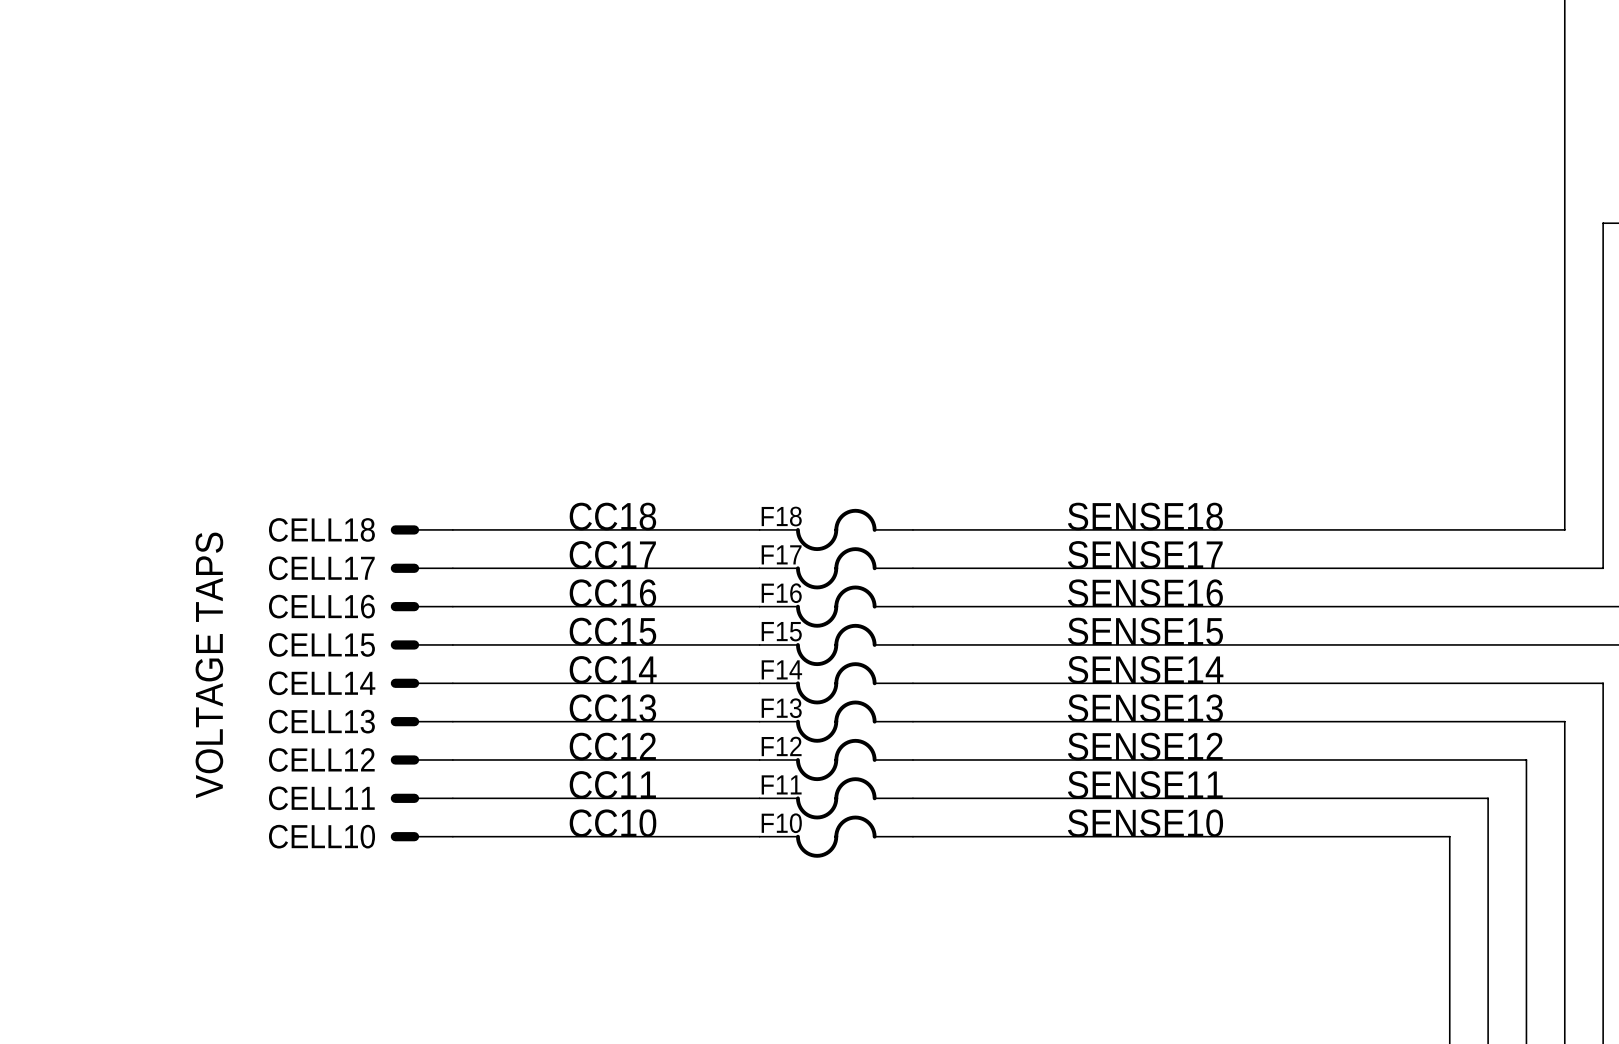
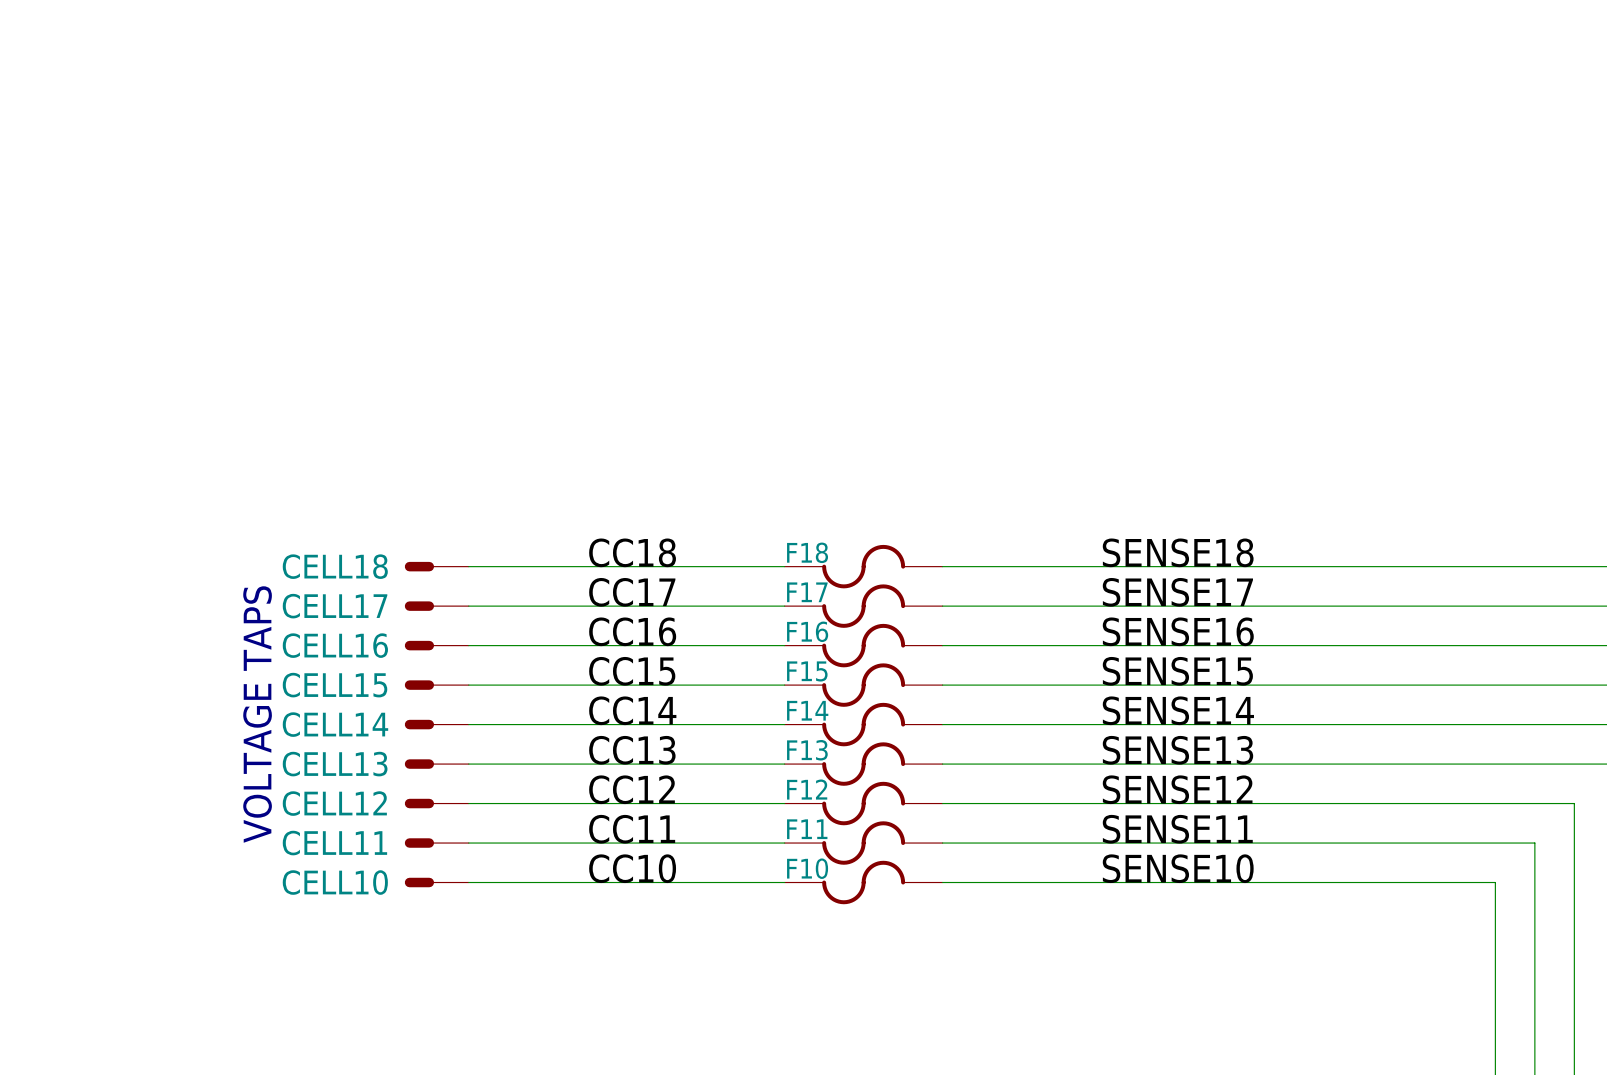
text position: VOLTAGE TAPS (209, 665) -> VOLTAGE TAPS (257, 714)

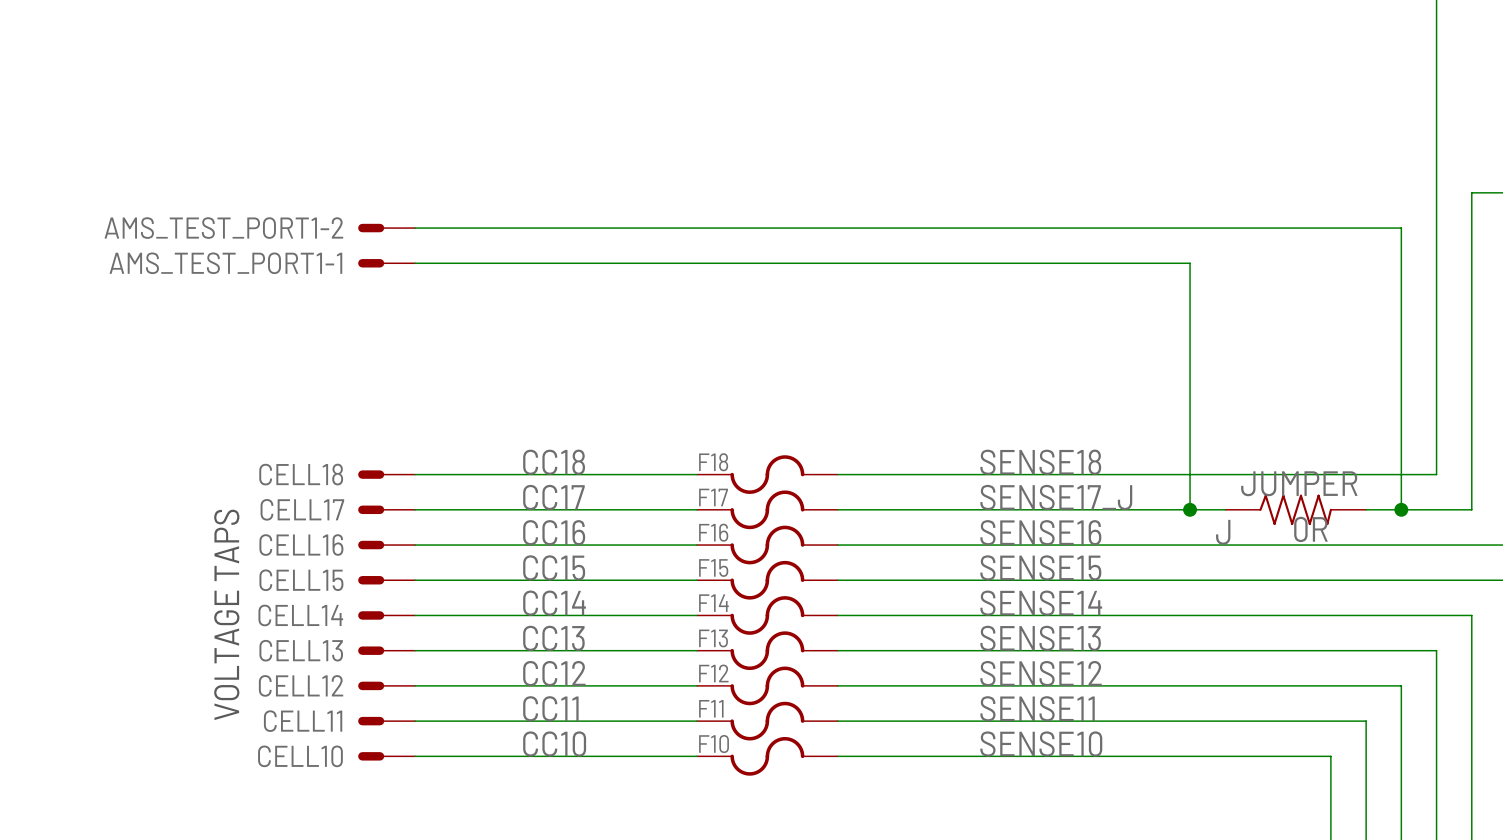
AMS_TEST_PORT1-2: none -> (386, 228)
wire: none -> (415, 228) (1401, 228) (1401, 509)
AMS_TEST_PORT1-1: none -> (386, 263)
wire: none -> (415, 263) (1190, 263) (1190, 509)
label: SENSE17 (1177, 592) -> SENSE17_J (1056, 497)
junction: none -> (1190, 509)
J: none -> 0R (1295, 509)
junction: none -> (1401, 509)

